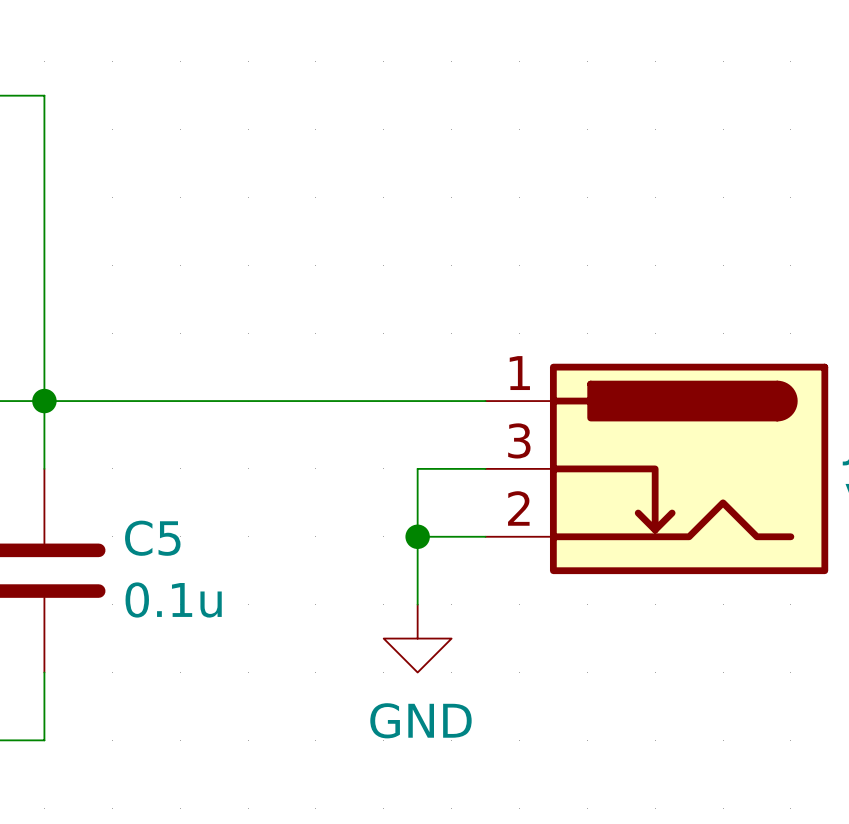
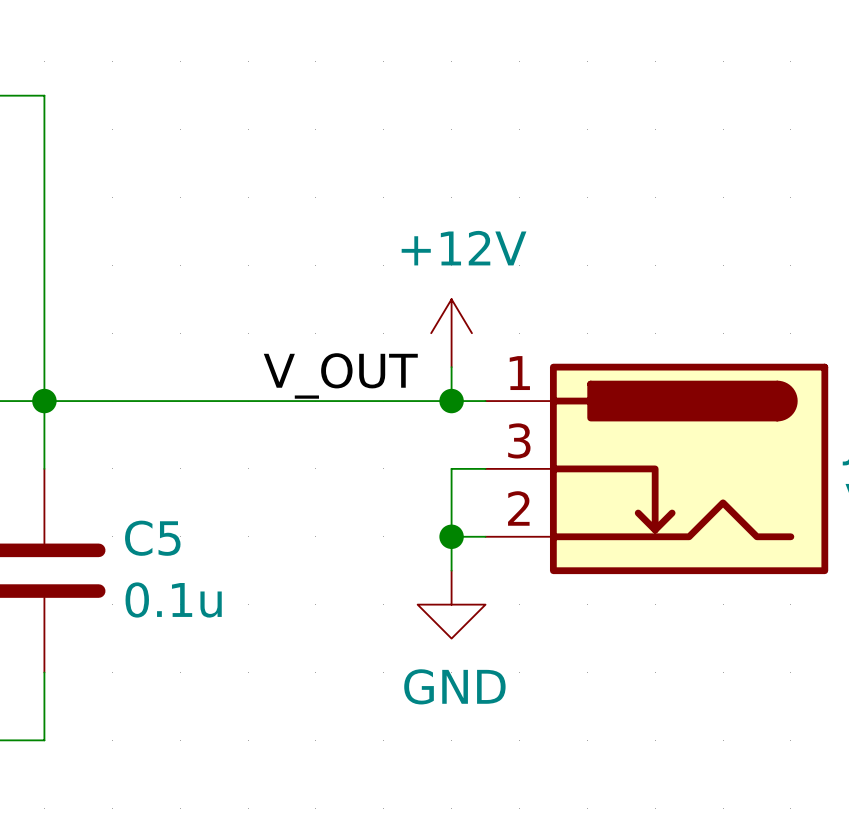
power symbol: none -> +12V (451, 333)
wire: none -> (451, 367) (451, 401)
label: none -> V_OUT (340, 375)
junction: none -> (451, 401)
wire: (451, 468) (417, 468) (417, 604) -> (451, 468) (451, 570)
wire: (417, 536) (451, 536) -> none
junction position: (417, 536) -> (451, 536)
power symbol position: GND (417, 638) -> GND (451, 604)

